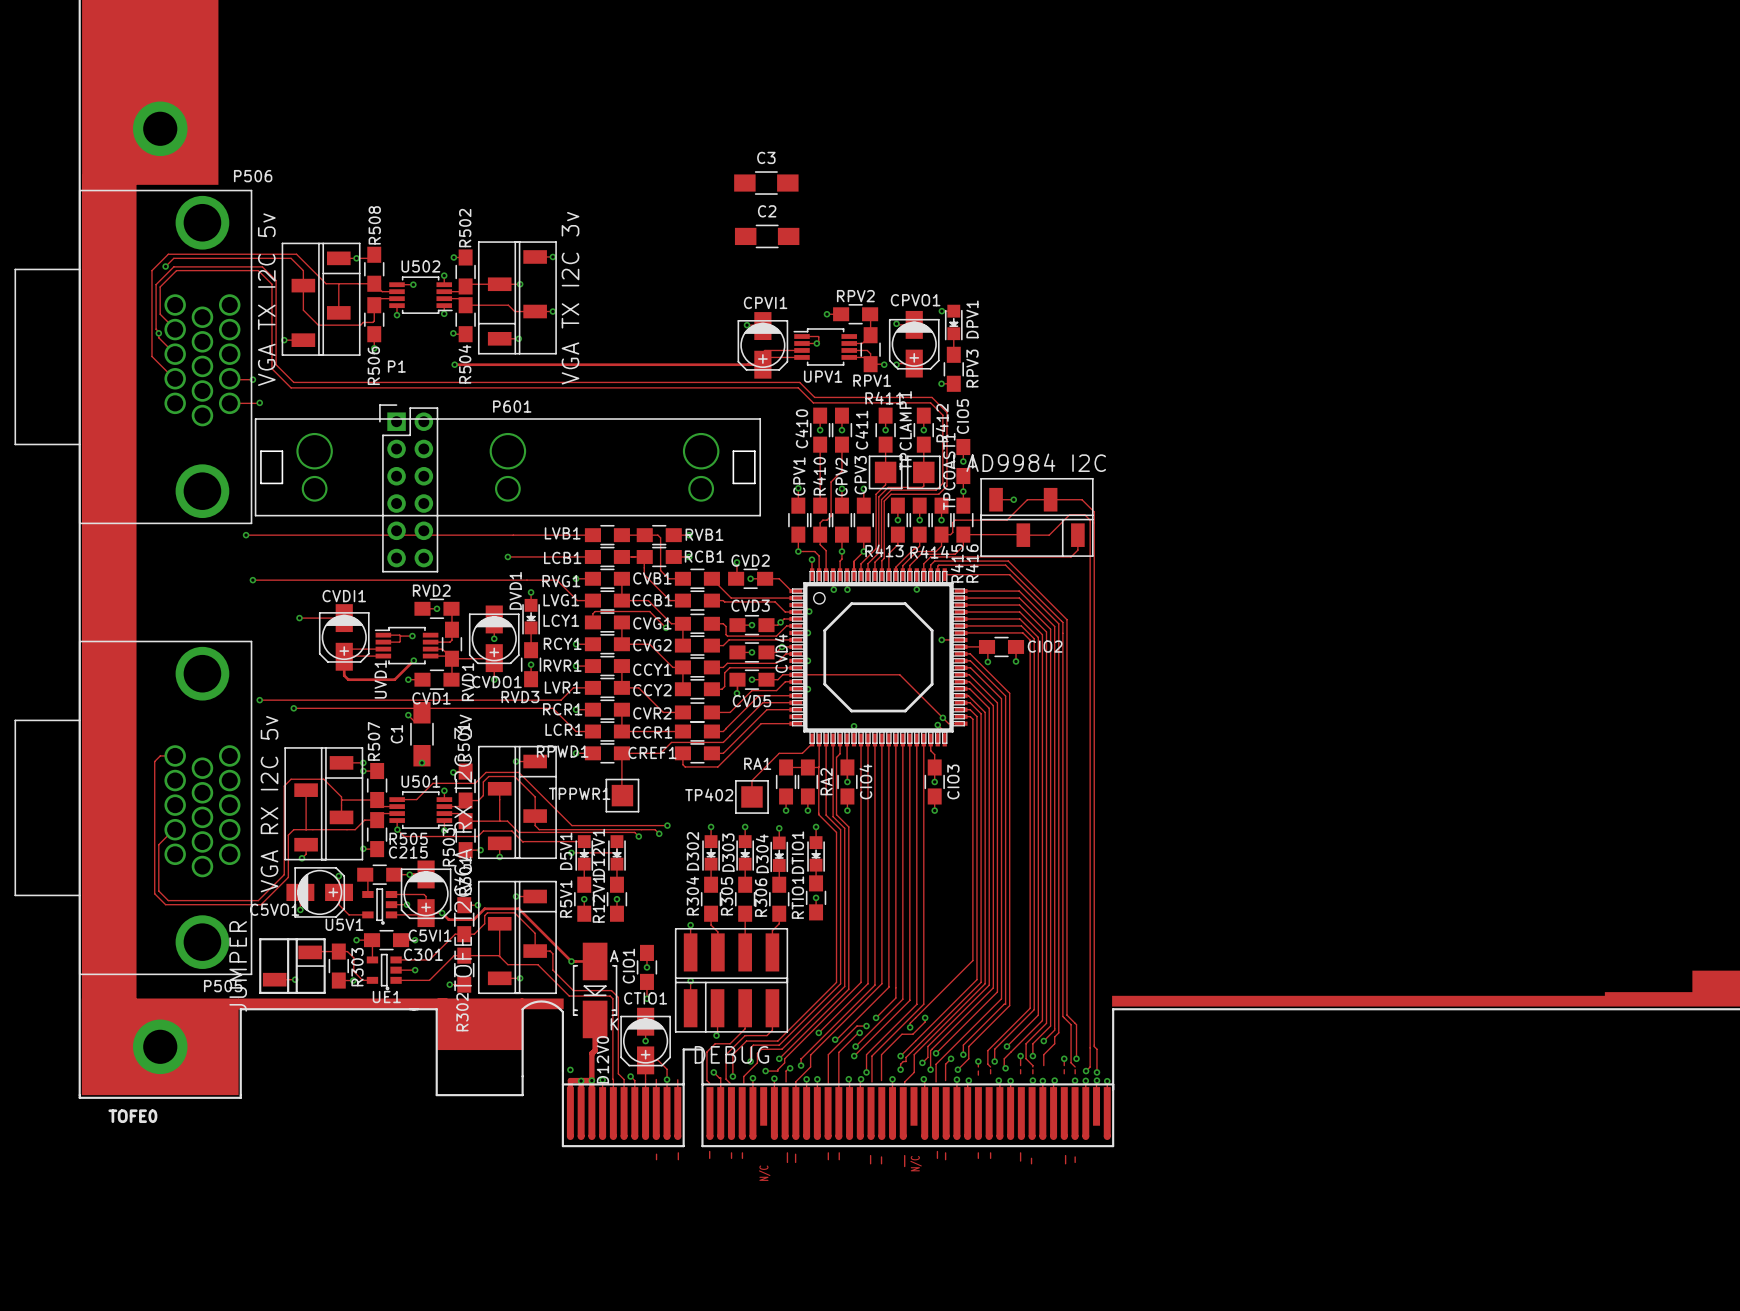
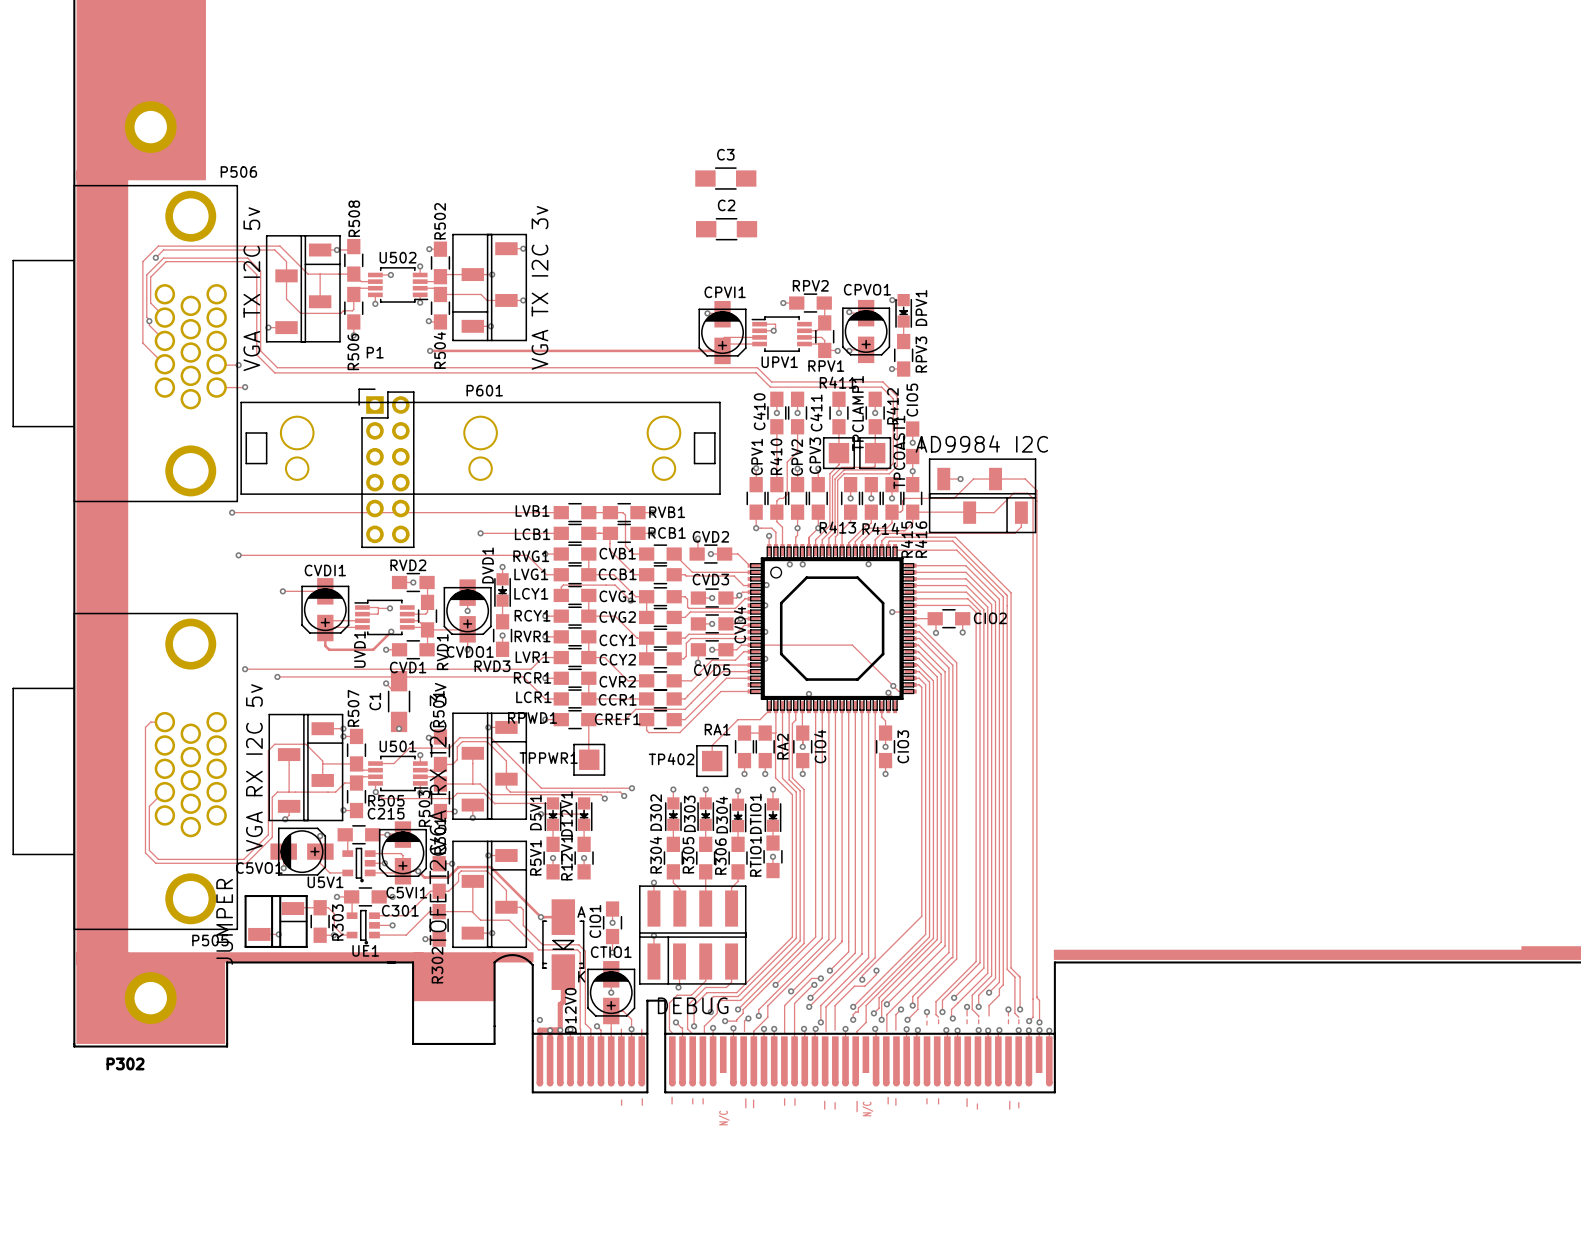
TOFE0 name: TOFE0 (132, 1116) -> P302 (125, 1063)

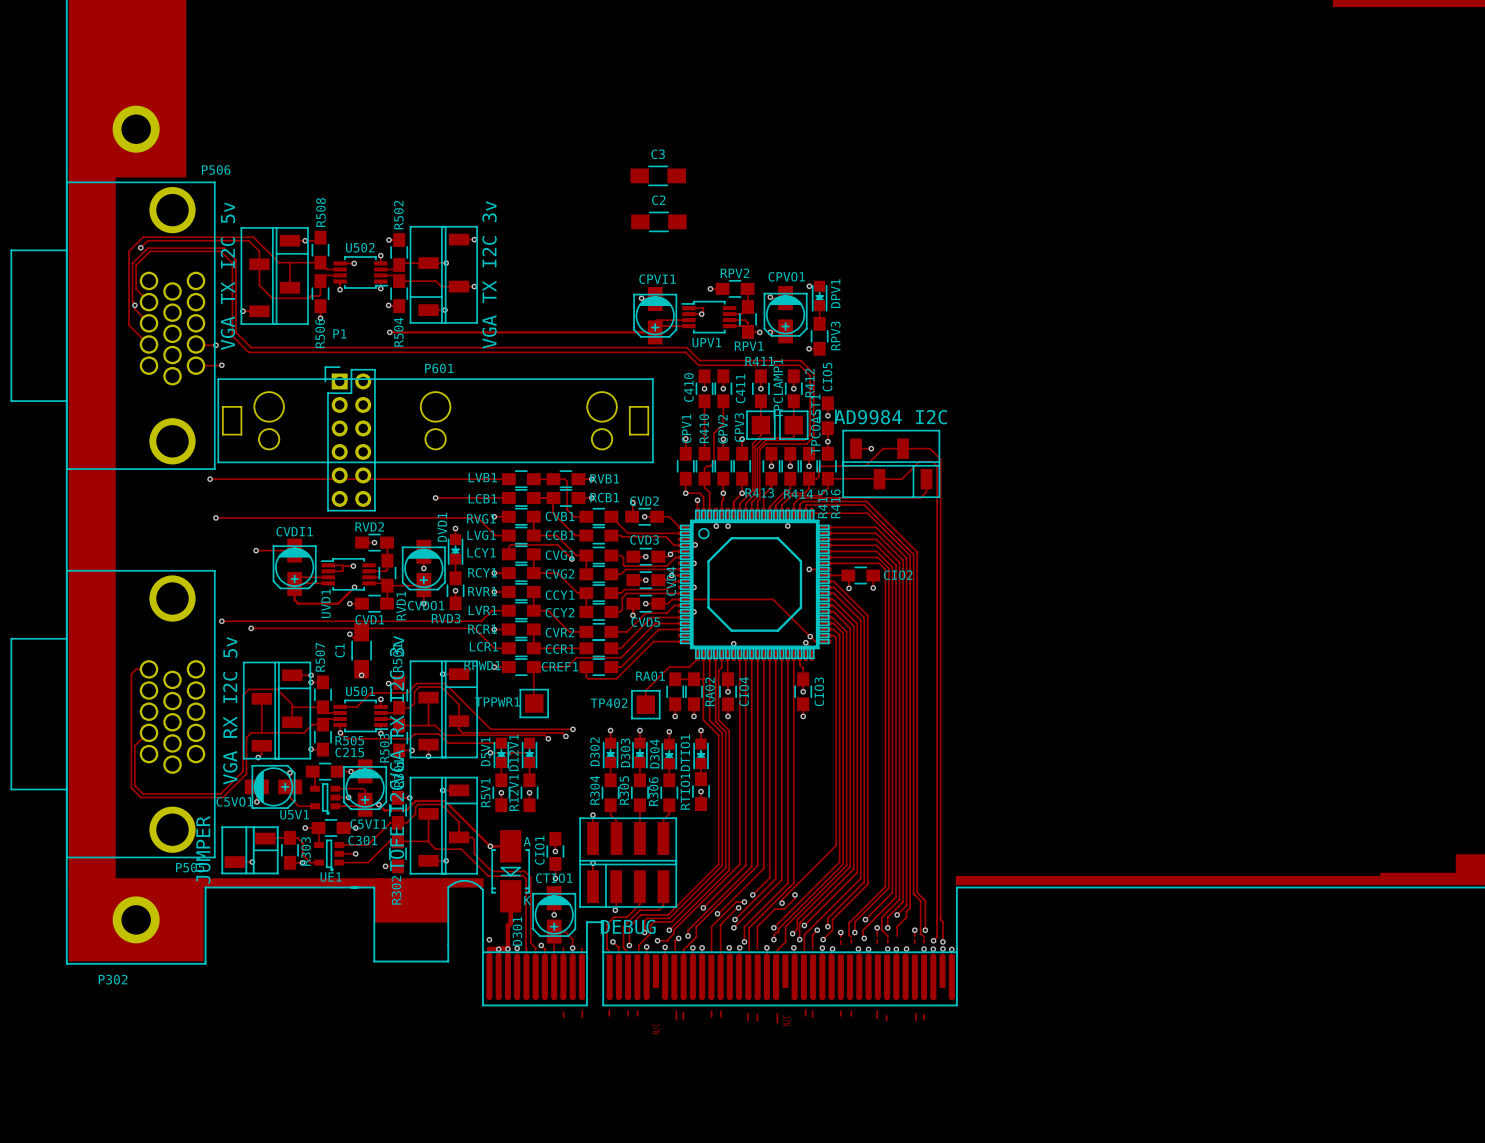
RA1 name: RA1 (717, 729) -> RA01 (650, 676)
RA2 name: RA2 (782, 746) -> RA02 (710, 691)
D12V0 name: D12V0 (570, 1010) -> D301 (517, 931)

